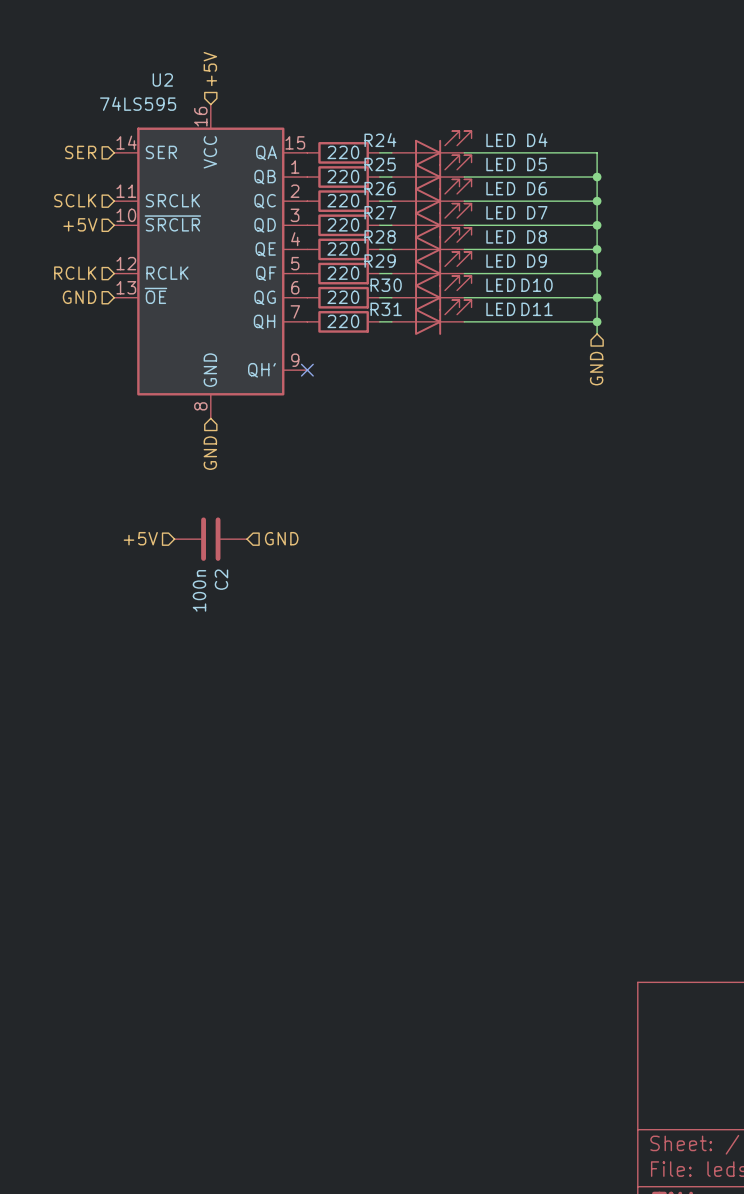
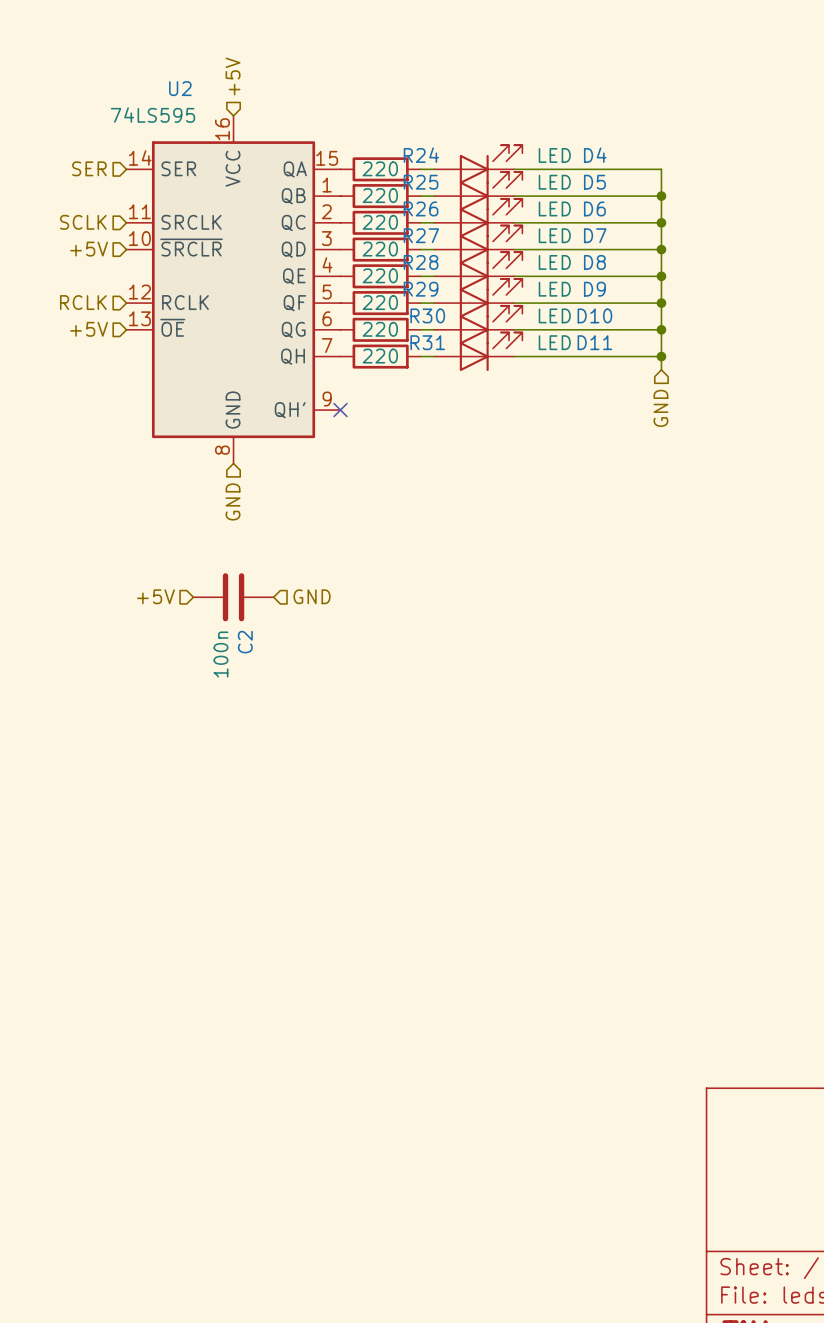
hierarchical label: GND (79, 297) -> +5V (89, 329)

